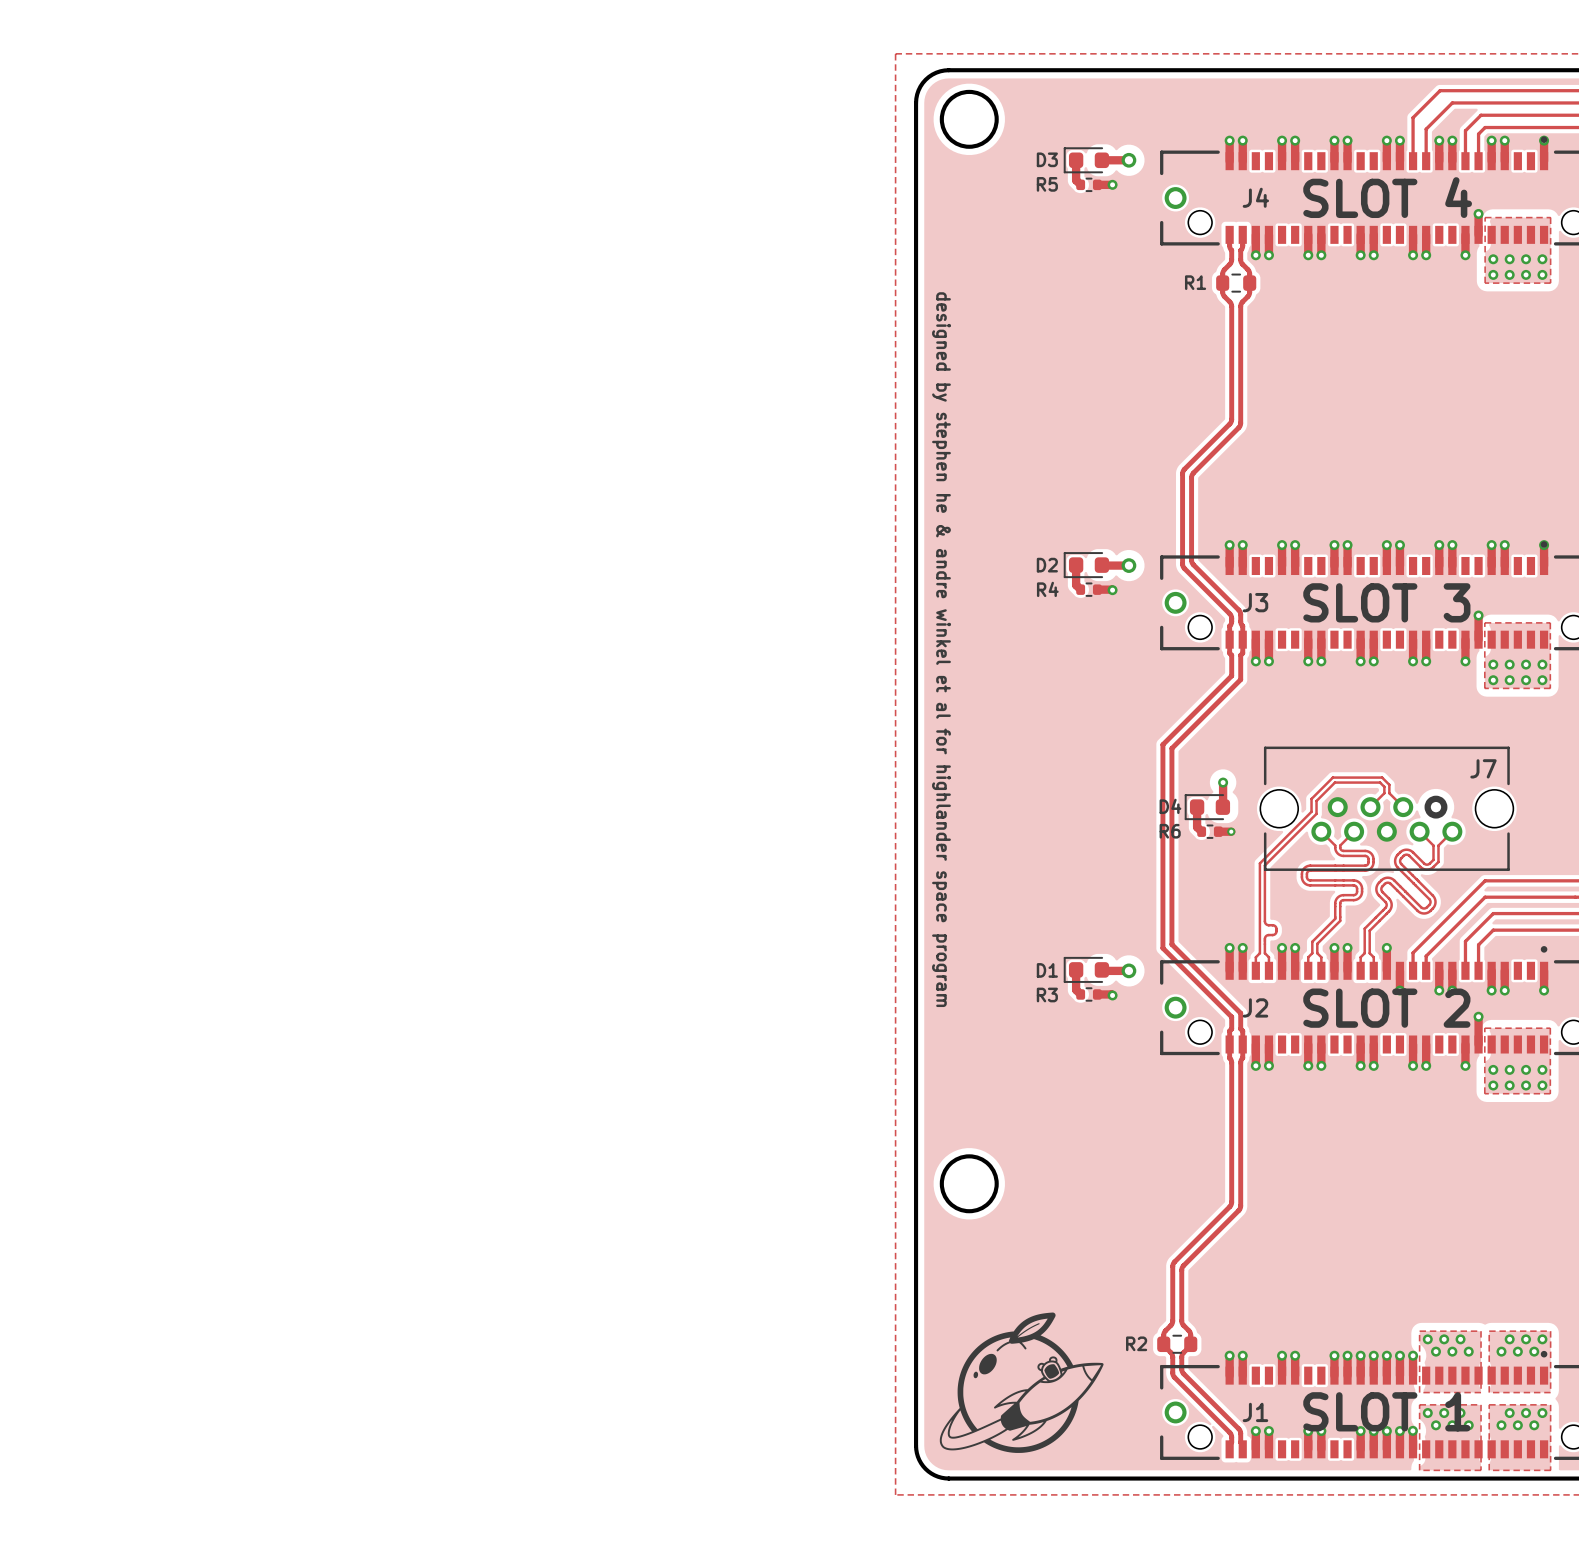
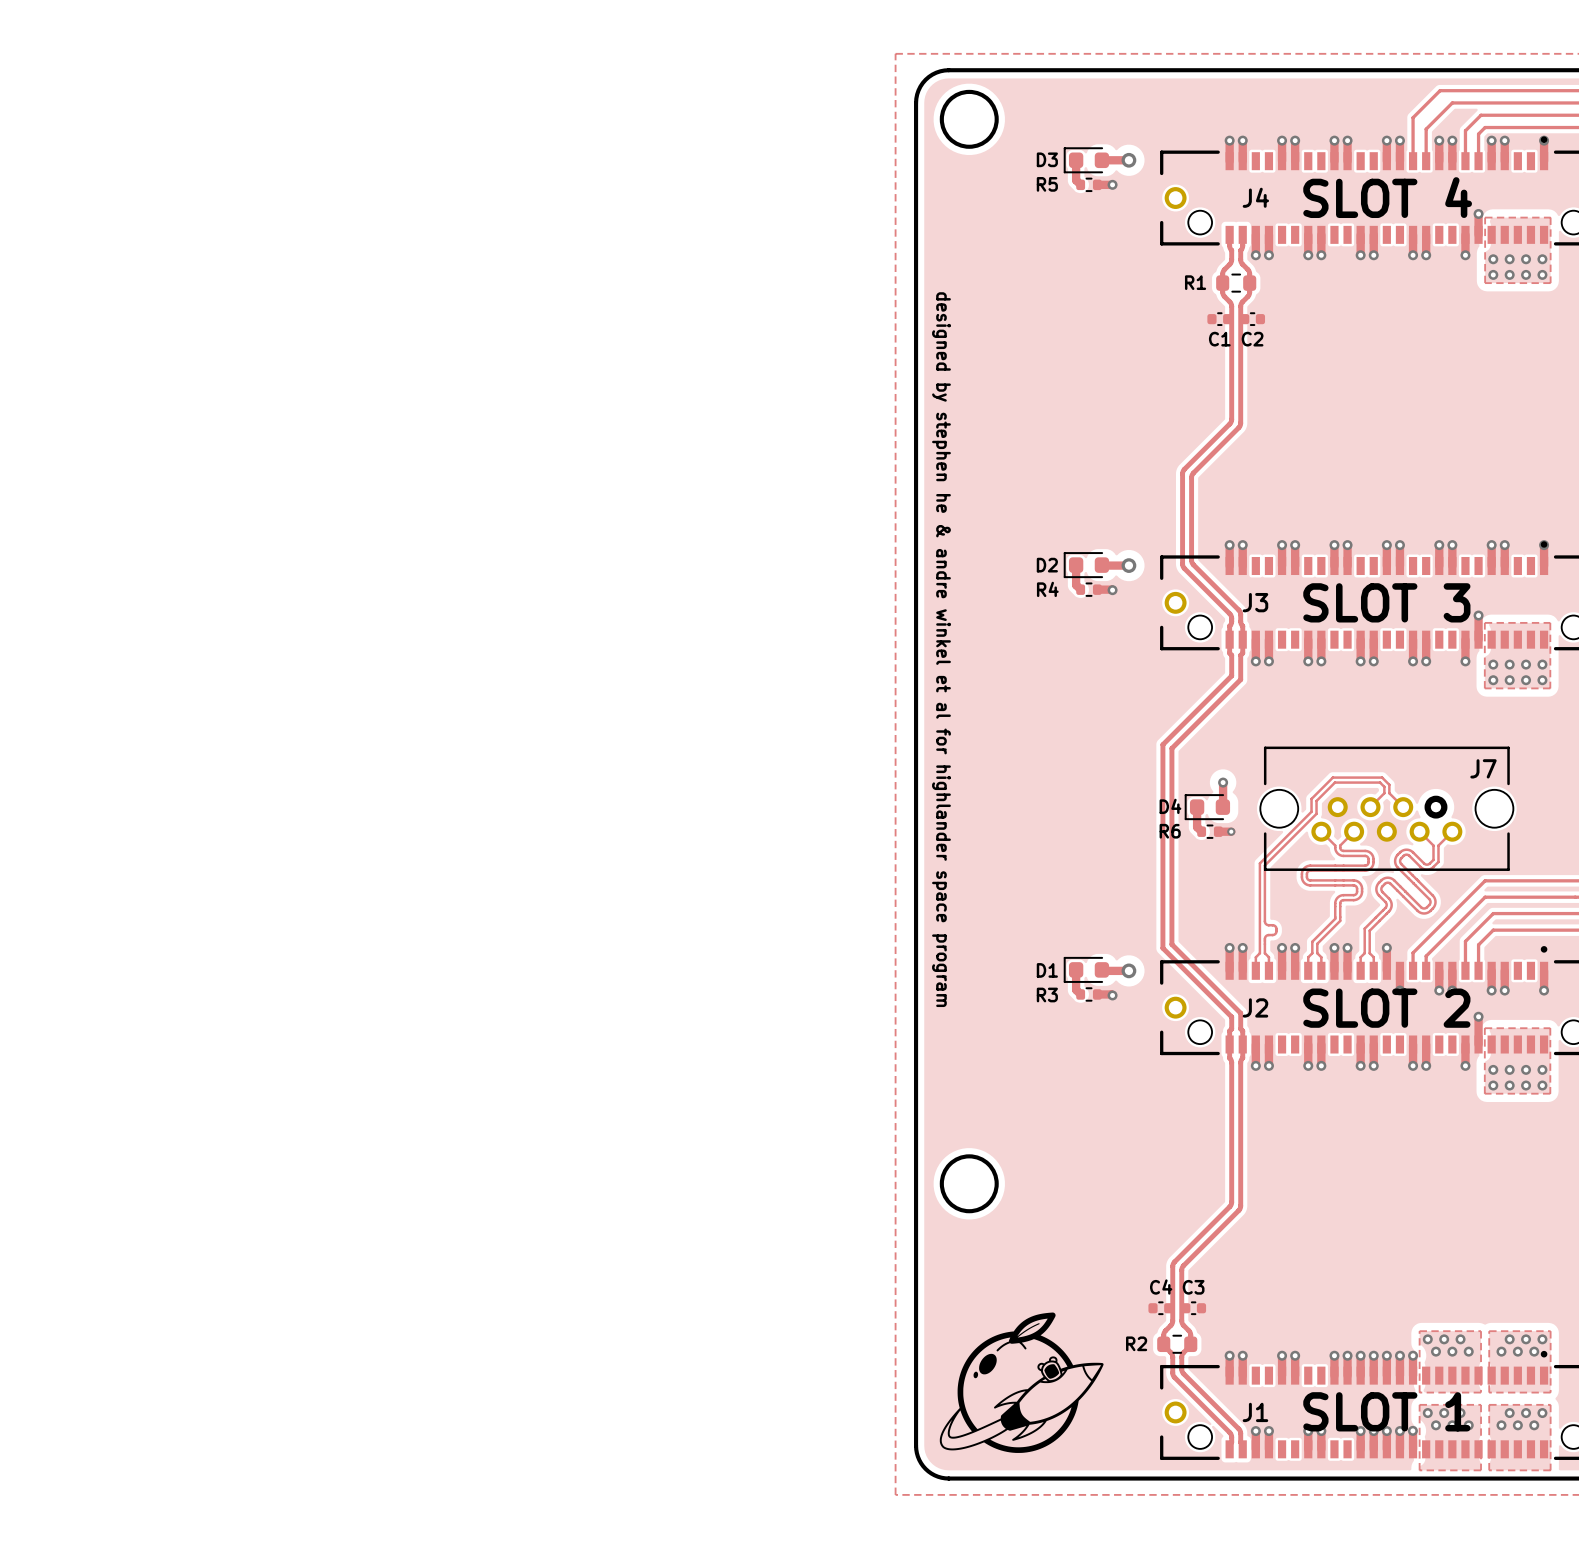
C1: none -> (1219, 319)
C2: none -> (1252, 319)
C4: none -> (1160, 1308)
C3: none -> (1193, 1308)

